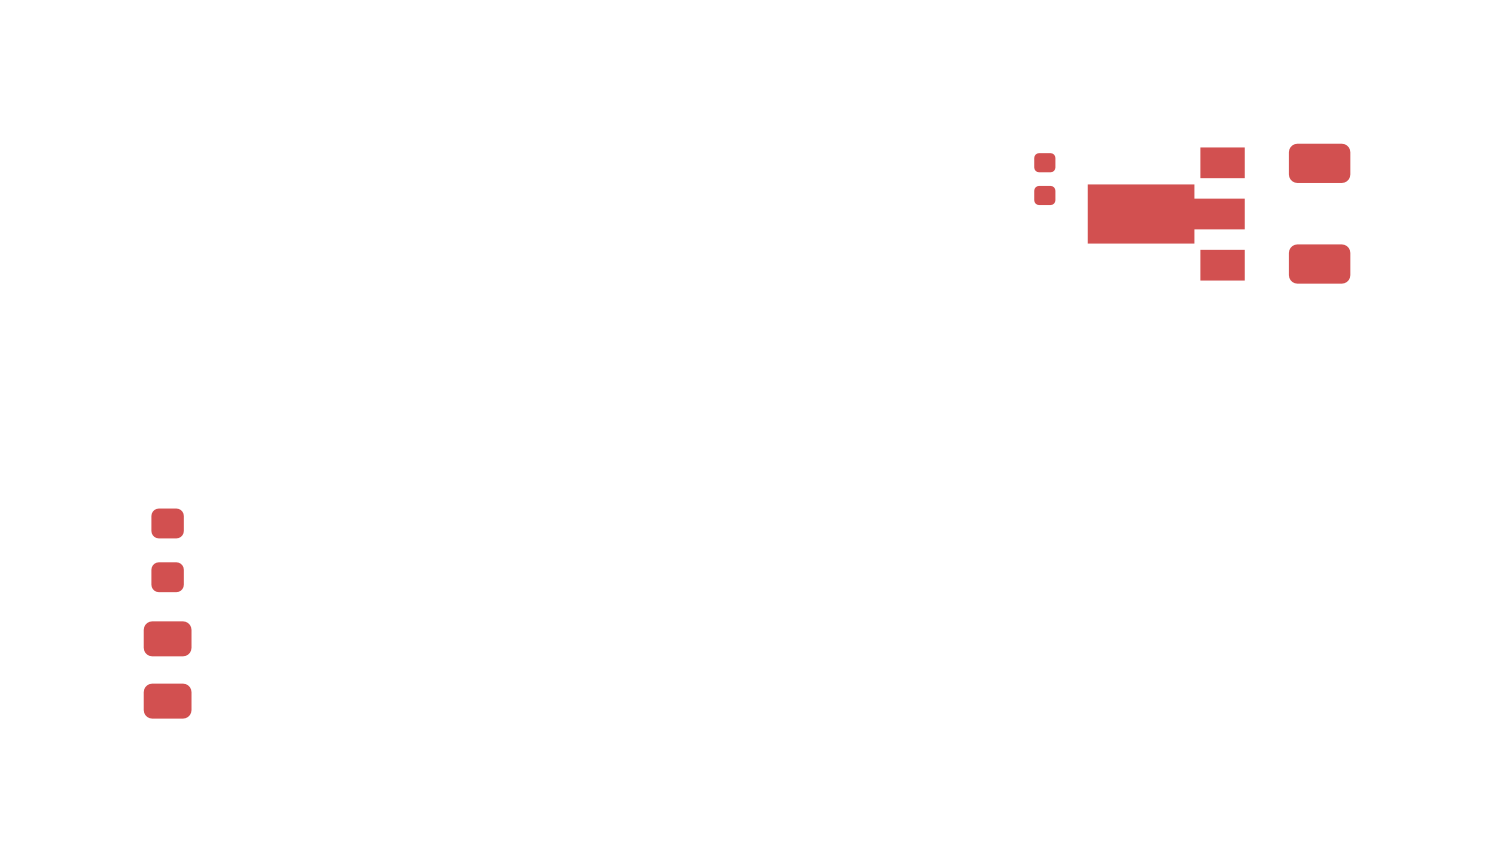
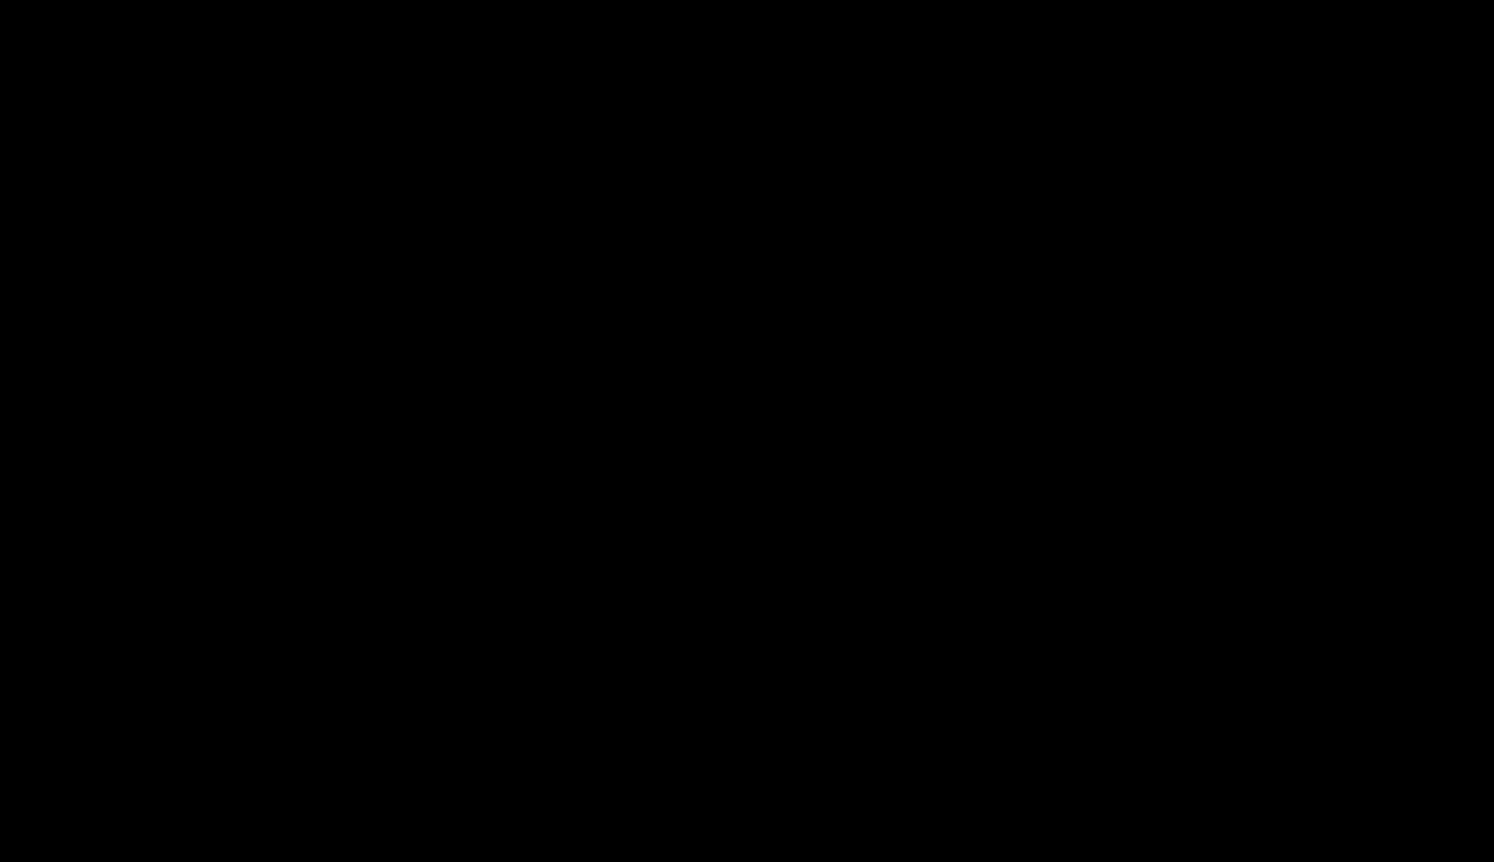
part: (1044, 179) -> none
part: (1319, 213) -> none
part: (1166, 214) -> none
part: (167, 550) -> none
part: (167, 669) -> none

